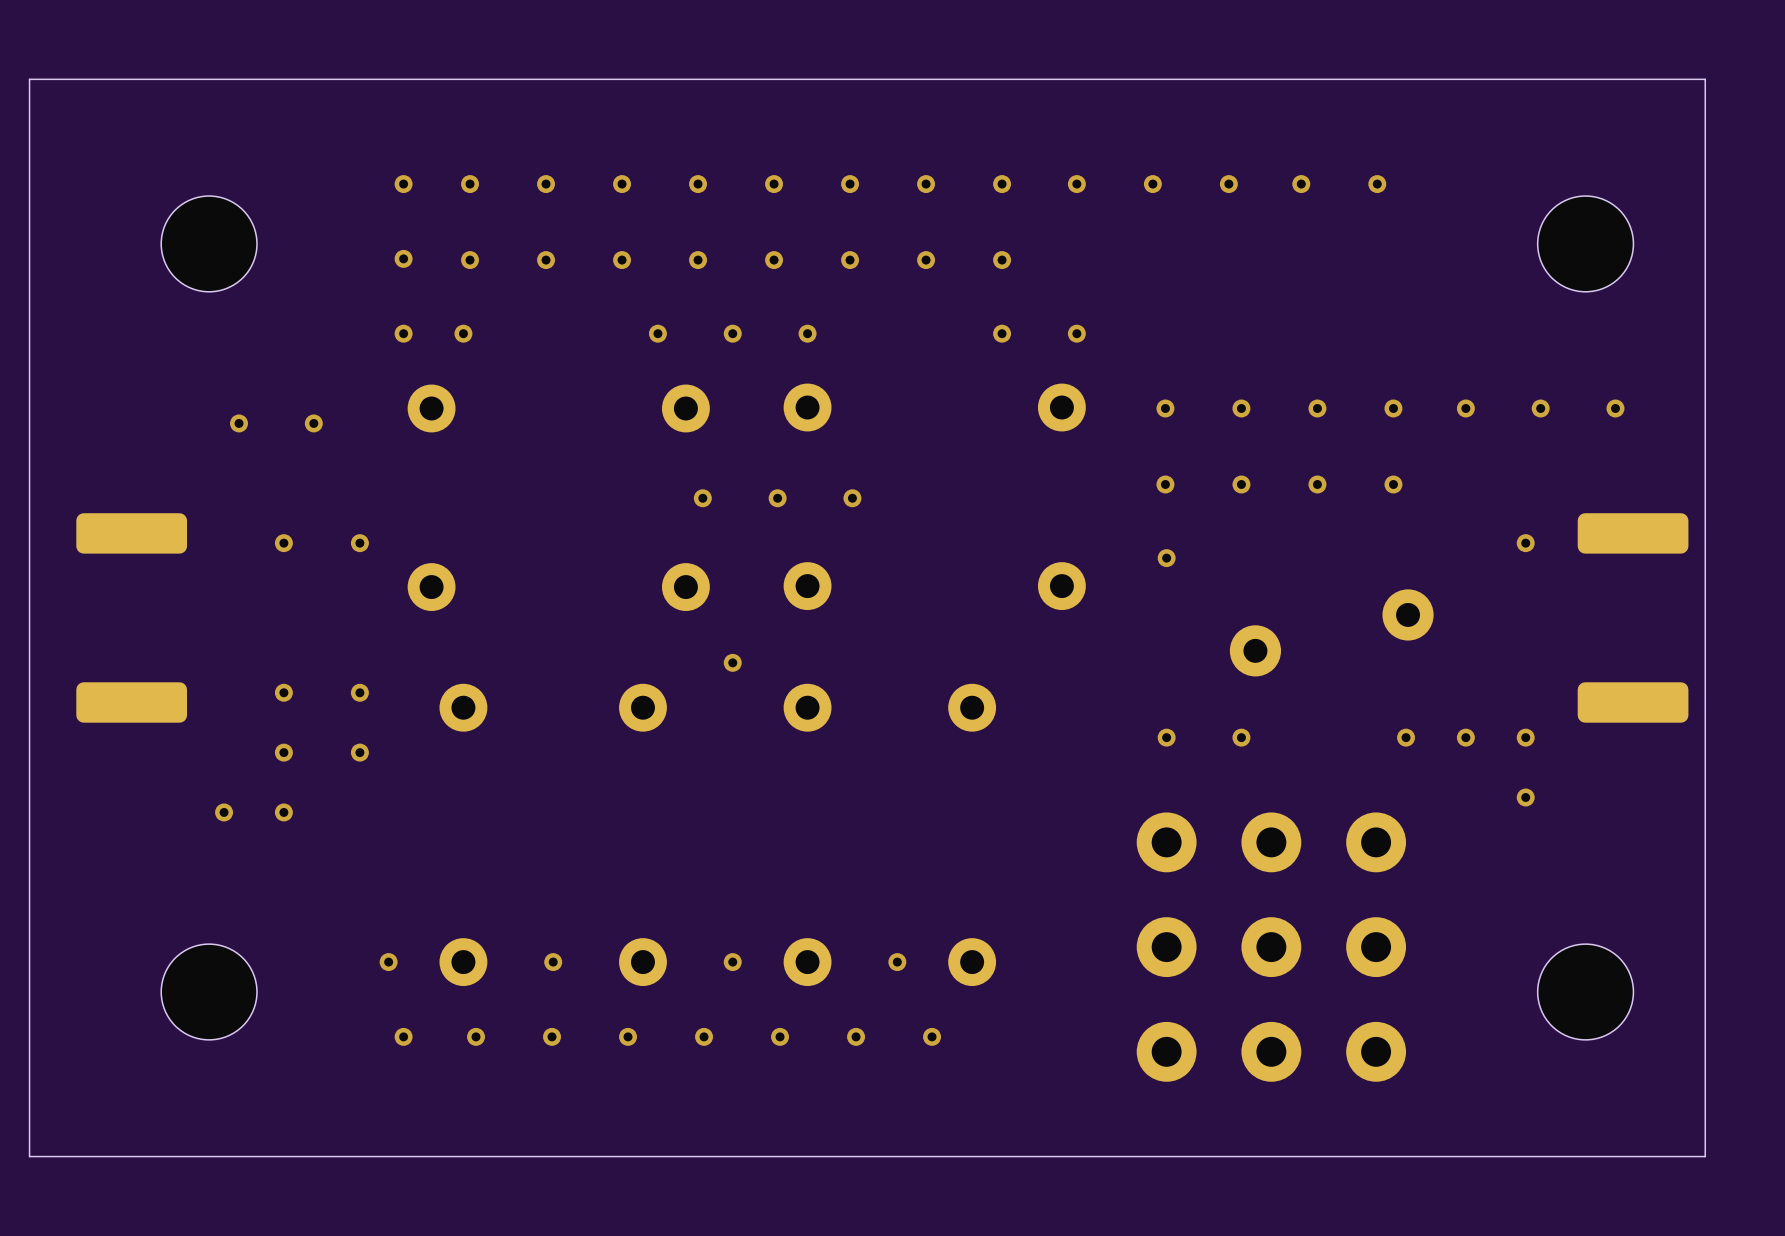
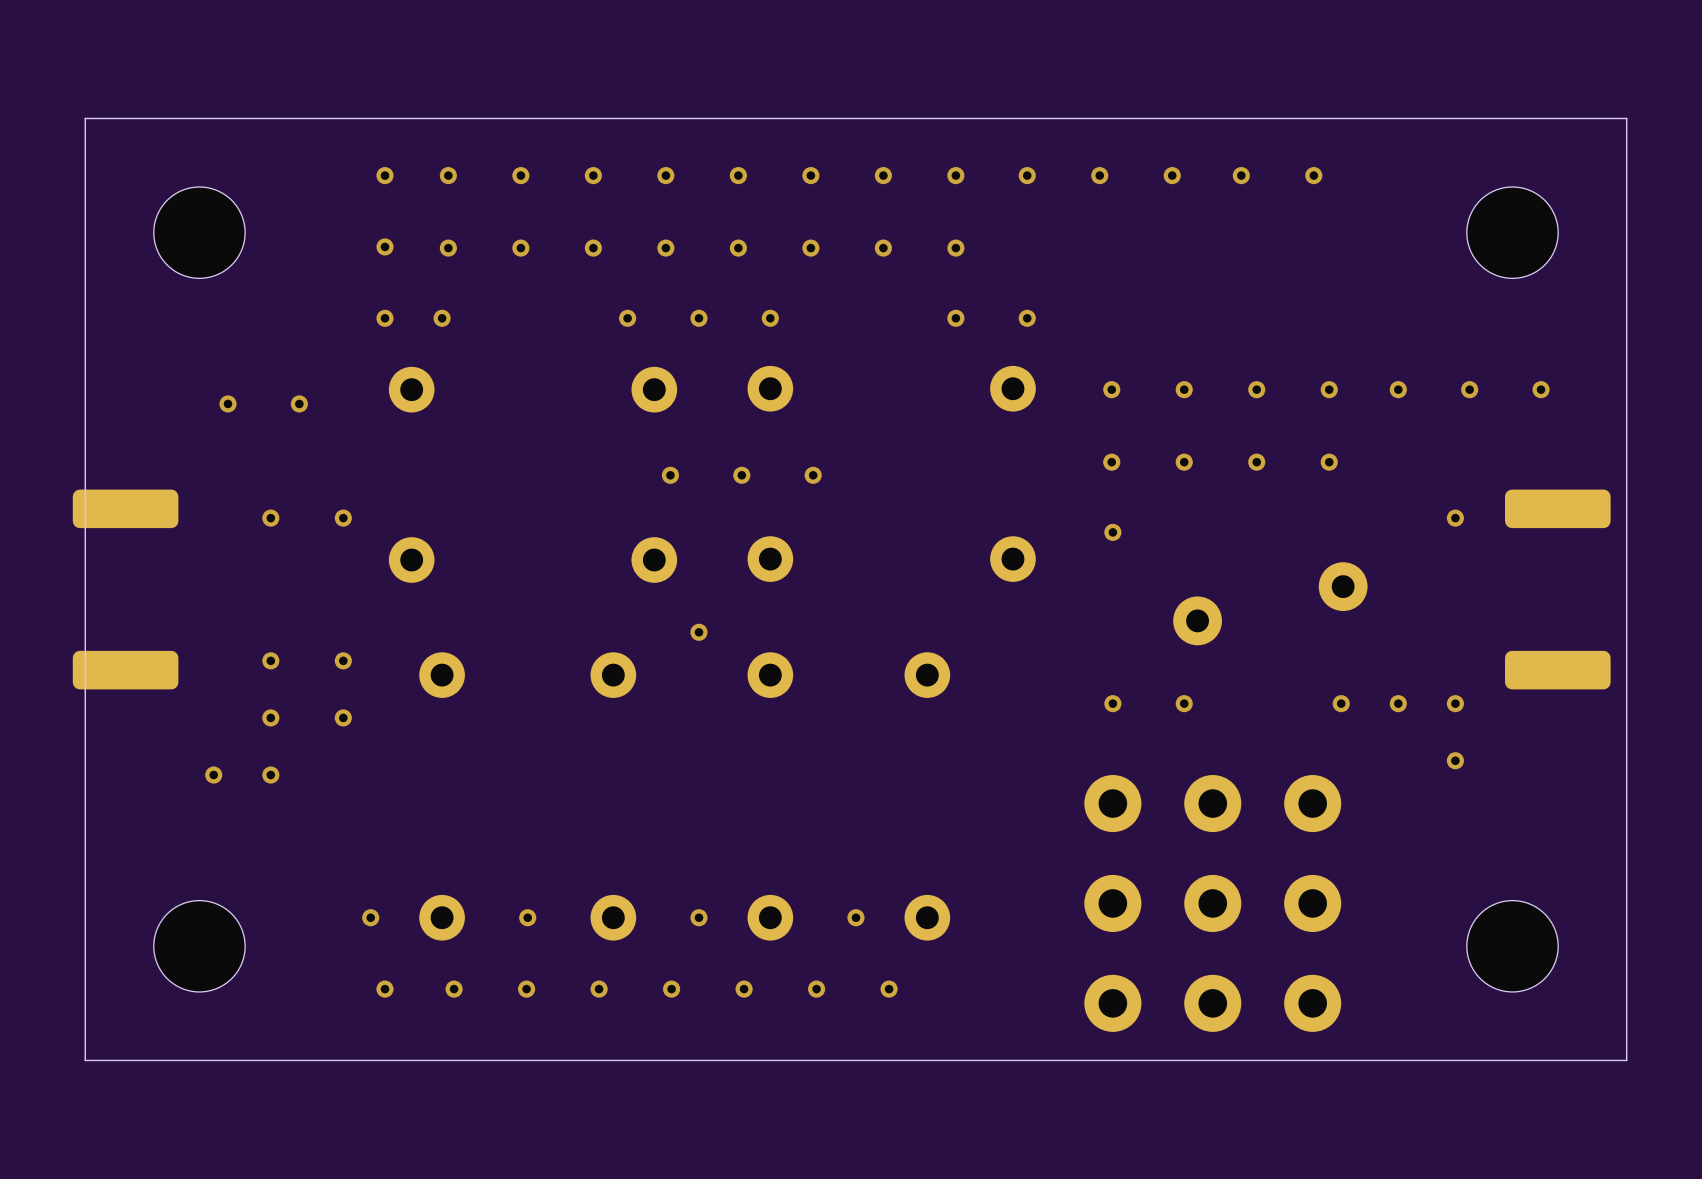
board edge: (1705, 124) (1705, 79) (29, 79) (29, 1156) (1705, 1156) (1705, 1111) -> (1626, 118) (85, 118) (85, 1060) (1626, 1060)

